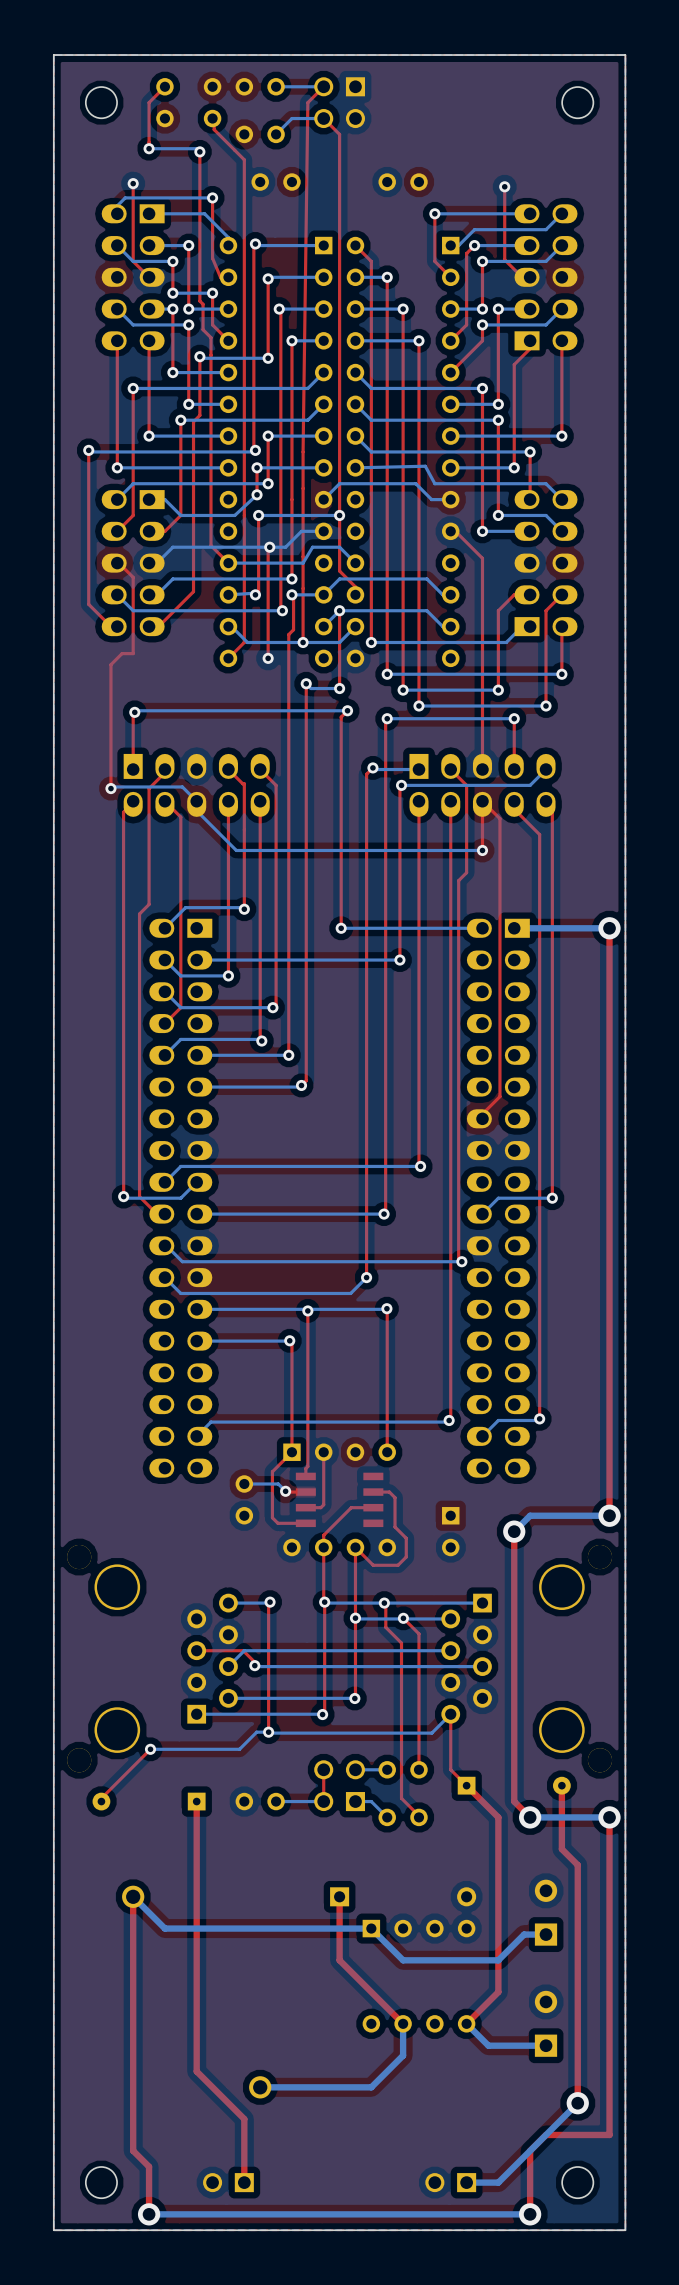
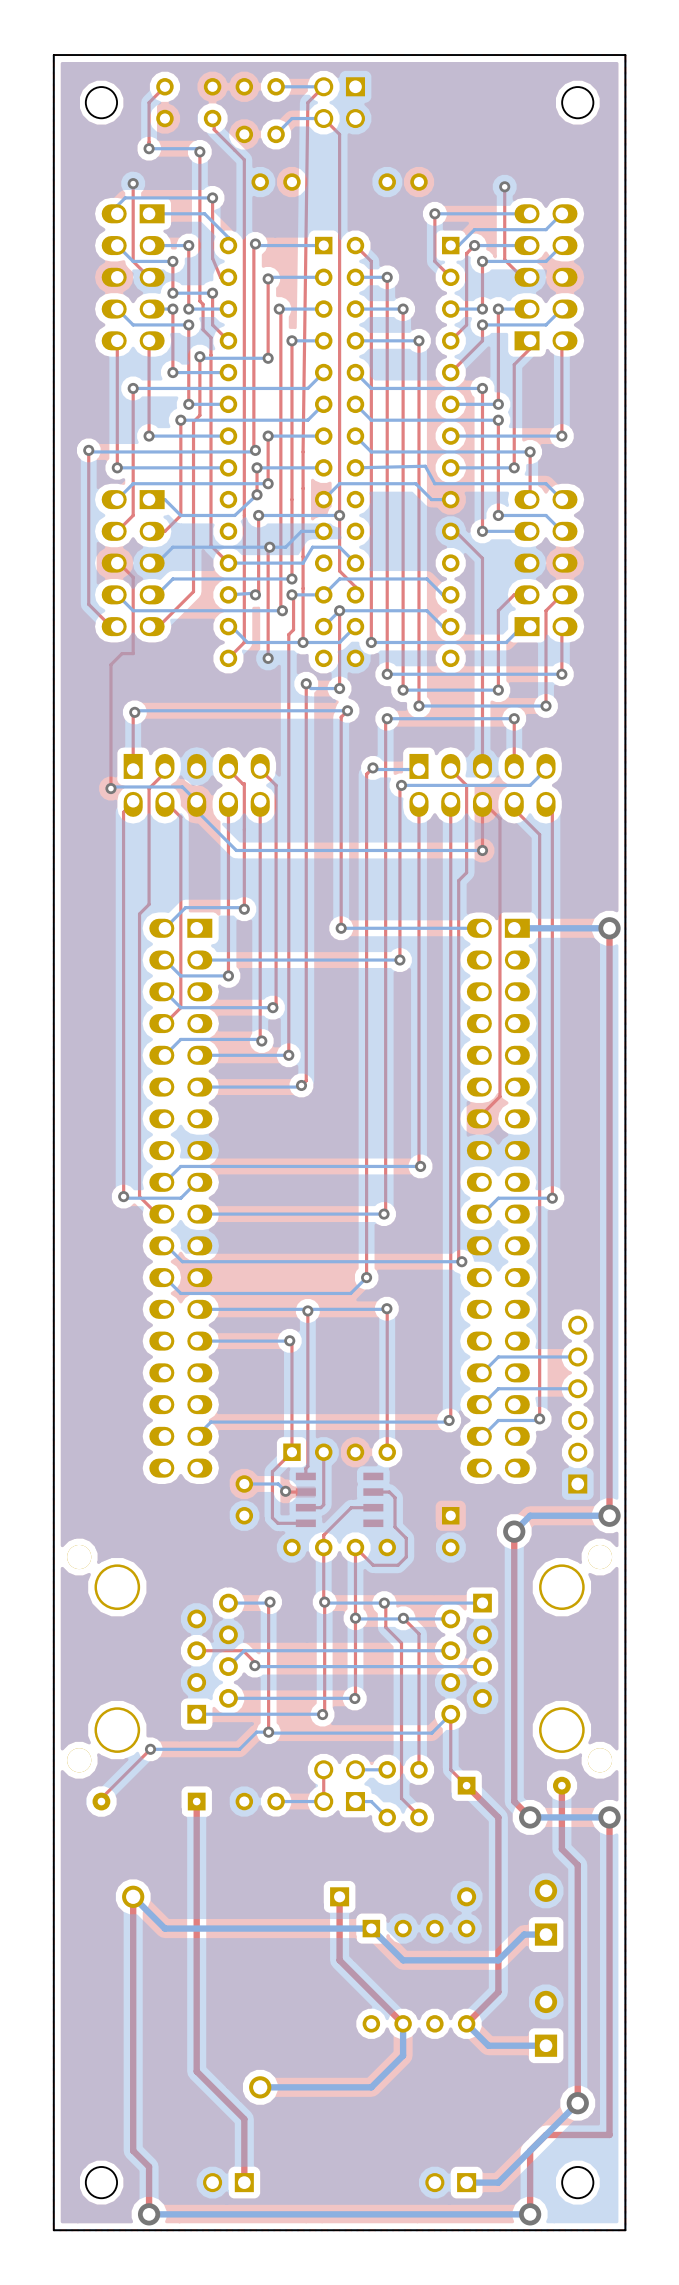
bottom track: none -> (577, 1356) (498, 1356) (482, 1372)
bottom track: none -> (577, 1388) (498, 1388) (482, 1404)
part: none -> (577, 1404)

